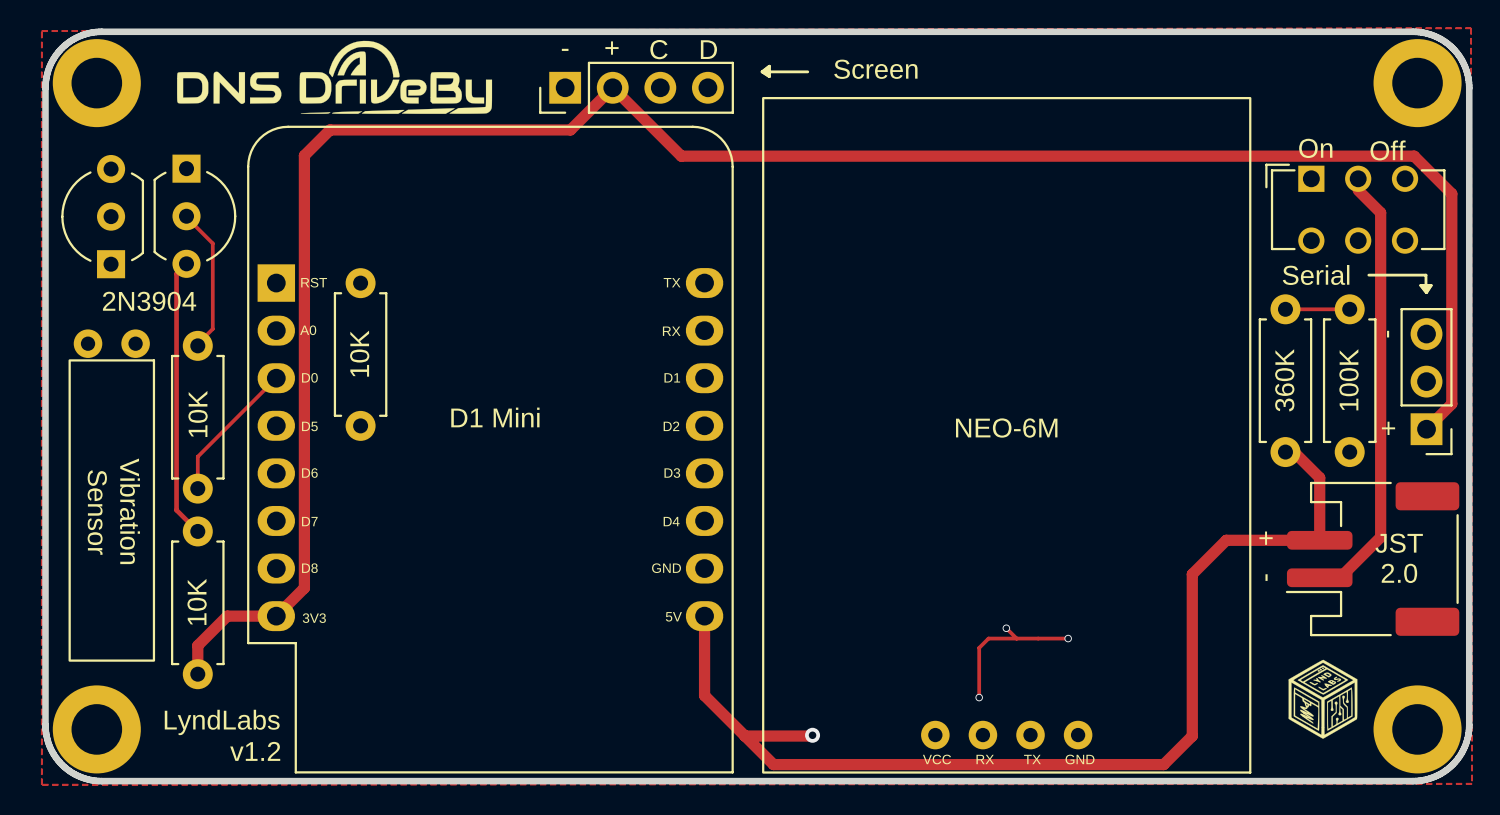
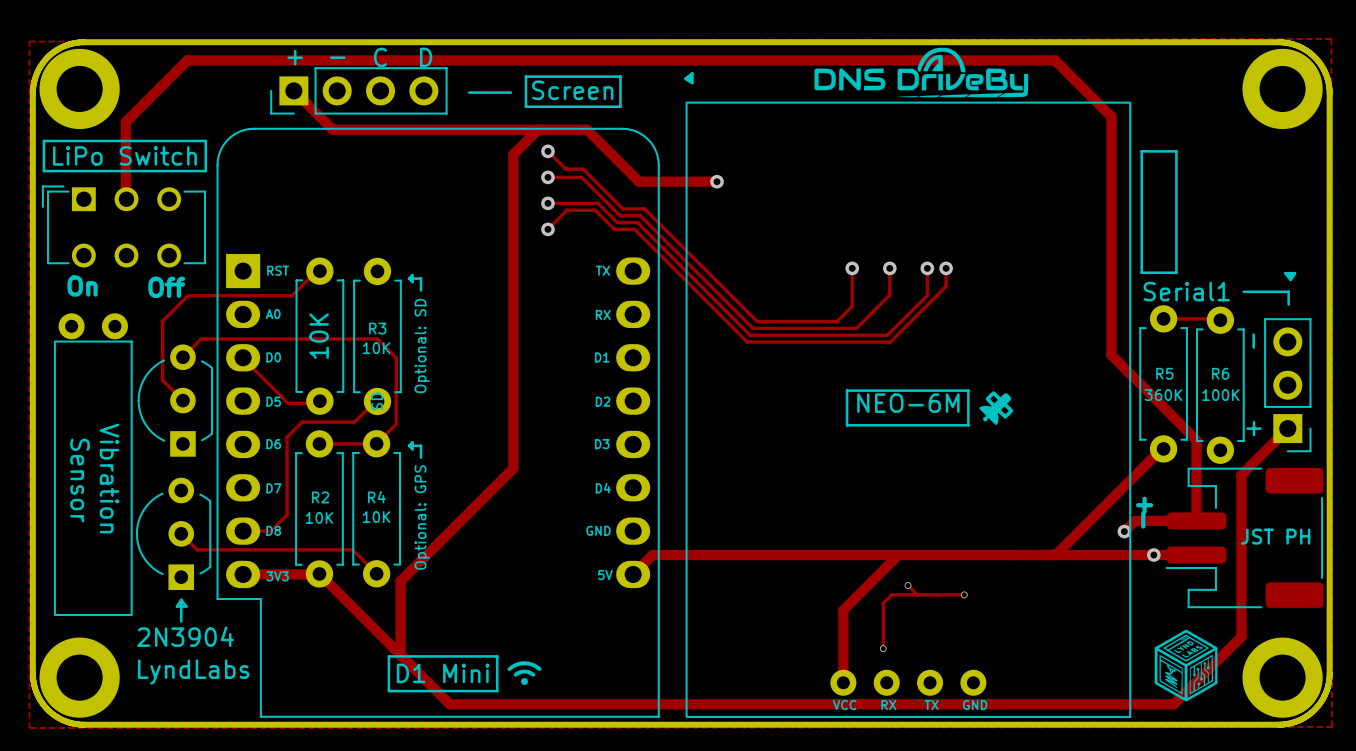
drawing: none -> [507, 47, 1218, 702]
drawing: [177, 40, 1358, 739] -> none
text position: + (611, 48) -> + (295, 57)
text position: - (565, 49) -> - (337, 57)
text position: C (659, 49) -> C (380, 57)
text position: D (708, 49) -> D (426, 57)
line: none -> (526, 76) (620, 76) (620, 106) (526, 106) (526, 76)
text position: Screen (875, 69) -> Screen (572, 90)
line: (762, 71) (807, 71) -> (469, 92) (510, 92)
track: none -> (293, 90) (332, 129) (586, 129) (638, 181) (717, 181)
track: (612, 87) (570, 129) (330, 129) (304, 155) (304, 588) (276, 616) (227, 616) (197, 645) (197, 674) -> none
track: (612, 87) (681, 156) (1414, 156) (1451, 193) (1451, 403) (1426, 429) -> none
part position: (636, 87) -> (358, 90)
track: none -> (538, 129) (513, 154) (513, 468) (400, 581) (400, 655)
line: none -> (43, 140) (205, 140) (205, 171) (43, 171) (43, 140)
text: On (1315, 148) -> none
text: Off (1388, 150) -> none
track: none -> (547, 151) (565, 169) (583, 169) (622, 208) (644, 208) (757, 321) (837, 321) (852, 306) (852, 268)
via: none -> (547, 151)
line: none -> (1141, 151) (1176, 151) (1176, 272) (1141, 272) (1141, 151)
text: none -> LiPo Switch (124, 155)
track: none -> (547, 177) (581, 177) (620, 215) (640, 215) (752, 328) (856, 328) (889, 294) (889, 268)
via: none -> (547, 177)
via: none -> (717, 181)
track: (1358, 190) (1380, 212) (1380, 537) (1340, 577) (1319, 577) -> none
track: none -> (125, 191) (125, 122) (187, 60) (1055, 60) (1111, 116) (1111, 355) (1196, 440) (1196, 520) (1135, 520) (1124, 531)
track: none -> (547, 203) (598, 203) (617, 222) (637, 222) (750, 335) (887, 335) (927, 295) (927, 268)
via: none -> (547, 203)
part: (1355, 208) -> none
part position: (102, 216) -> (173, 533)
part: (194, 216) -> none
track: (186, 217) (212, 243) (212, 328) (197, 343) -> none
part: none -> (123, 226)
track: none -> (547, 229) (567, 210) (595, 210) (614, 229) (634, 229) (747, 342) (890, 342) (946, 286) (946, 268)
via: none -> (547, 229)
track: (186, 263) (176, 273) (176, 510) (197, 531) -> none
text: Serial (1316, 274) -> Serial1 (1186, 291)
line: (1368, 275) (1425, 275) (1425, 289) -> none
via: none -> (852, 268)
via: none -> (889, 268)
via: none -> (927, 268)
via: none -> (946, 268)
track: none -> (314, 273) (291, 295) (188, 295) (162, 321) (162, 380) (182, 400)
line: none -> (409, 278) (420, 278) (420, 290)
line: none -> (409, 278) (412, 282) (412, 275) (409, 278)
text: none -> On (82, 286)
text: none -> Off (166, 287)
part value position: 2N3904 (149, 301) -> 2N3904 (185, 636)
line: none -> (1243, 291) (1288, 291) (1288, 304)
track: (1285, 309) (1349, 309) -> (1163, 318) (1222, 318)
part footprint: [171, 330, 225, 504] -> [137, 344, 213, 457]
text position: - (1388, 334) -> - (1253, 341)
R3: none -> 10K (377, 336)
track: none -> (182, 357) (201, 339) (377, 339) (396, 357) (396, 424) (376, 443) (319, 443)
track: (276, 378) (197, 456) (197, 486) -> (243, 357) (288, 403) (314, 403)
part: 360K (1285, 380) -> none
part: 100K (1349, 380) -> none
part position: (1426, 381) -> (1287, 385)
R5: none -> 360K (1163, 383)
R6: none -> 100K (1220, 385)
part value: 10K (198, 413) -> none
line: none -> (847, 390) (968, 390) (968, 425) (847, 425) (847, 390)
part value position: D1 Mini (495, 417) -> D1 Mini (443, 673)
track: none -> (375, 400) (354, 422) (302, 422) (287, 437) (287, 514) (270, 531) (243, 531)
text position: + (1388, 428) -> + (1254, 428)
track: (1284, 442) (1319, 477) (1319, 540) (1226, 540) (1192, 574) (1192, 736) (1163, 764) (773, 764) (704, 695) (704, 616) -> (1196, 555) (652, 555) (633, 574)
track: none -> (1287, 428) (1241, 474) (1241, 636) (1173, 704) (449, 704) (319, 573) (243, 574)
line: none -> (409, 445) (420, 445) (420, 457)
line: none -> (409, 445) (412, 449) (412, 442) (409, 445)
track: none -> (1163, 448) (1055, 555)
text: JST (1399, 543) -> none
R2: none -> 10K (319, 508)
R4: none -> 10K (376, 508)
part position: (1372, 559) -> (1244, 537)
via: none -> (1124, 531)
track: none -> (181, 533) (197, 549) (352, 549) (376, 573)
text: 2.0 (1399, 573) -> JST PH (1275, 536)
text position: - (1266, 577) -> - (1143, 520)
track: none -> (898, 555) (843, 610) (843, 682)
via: none -> (1153, 555)
part: 10K (197, 602) -> none
line: none -> (181, 599) (181, 621)
line: none -> (181, 599) (186, 606) (176, 606) (181, 599)
line: none -> (388, 656) (497, 656) (497, 691) (388, 691) (388, 656)
track: (812, 735) (745, 736) -> none
via: (812, 735) -> none
text: v1.2 (255, 751) -> none

